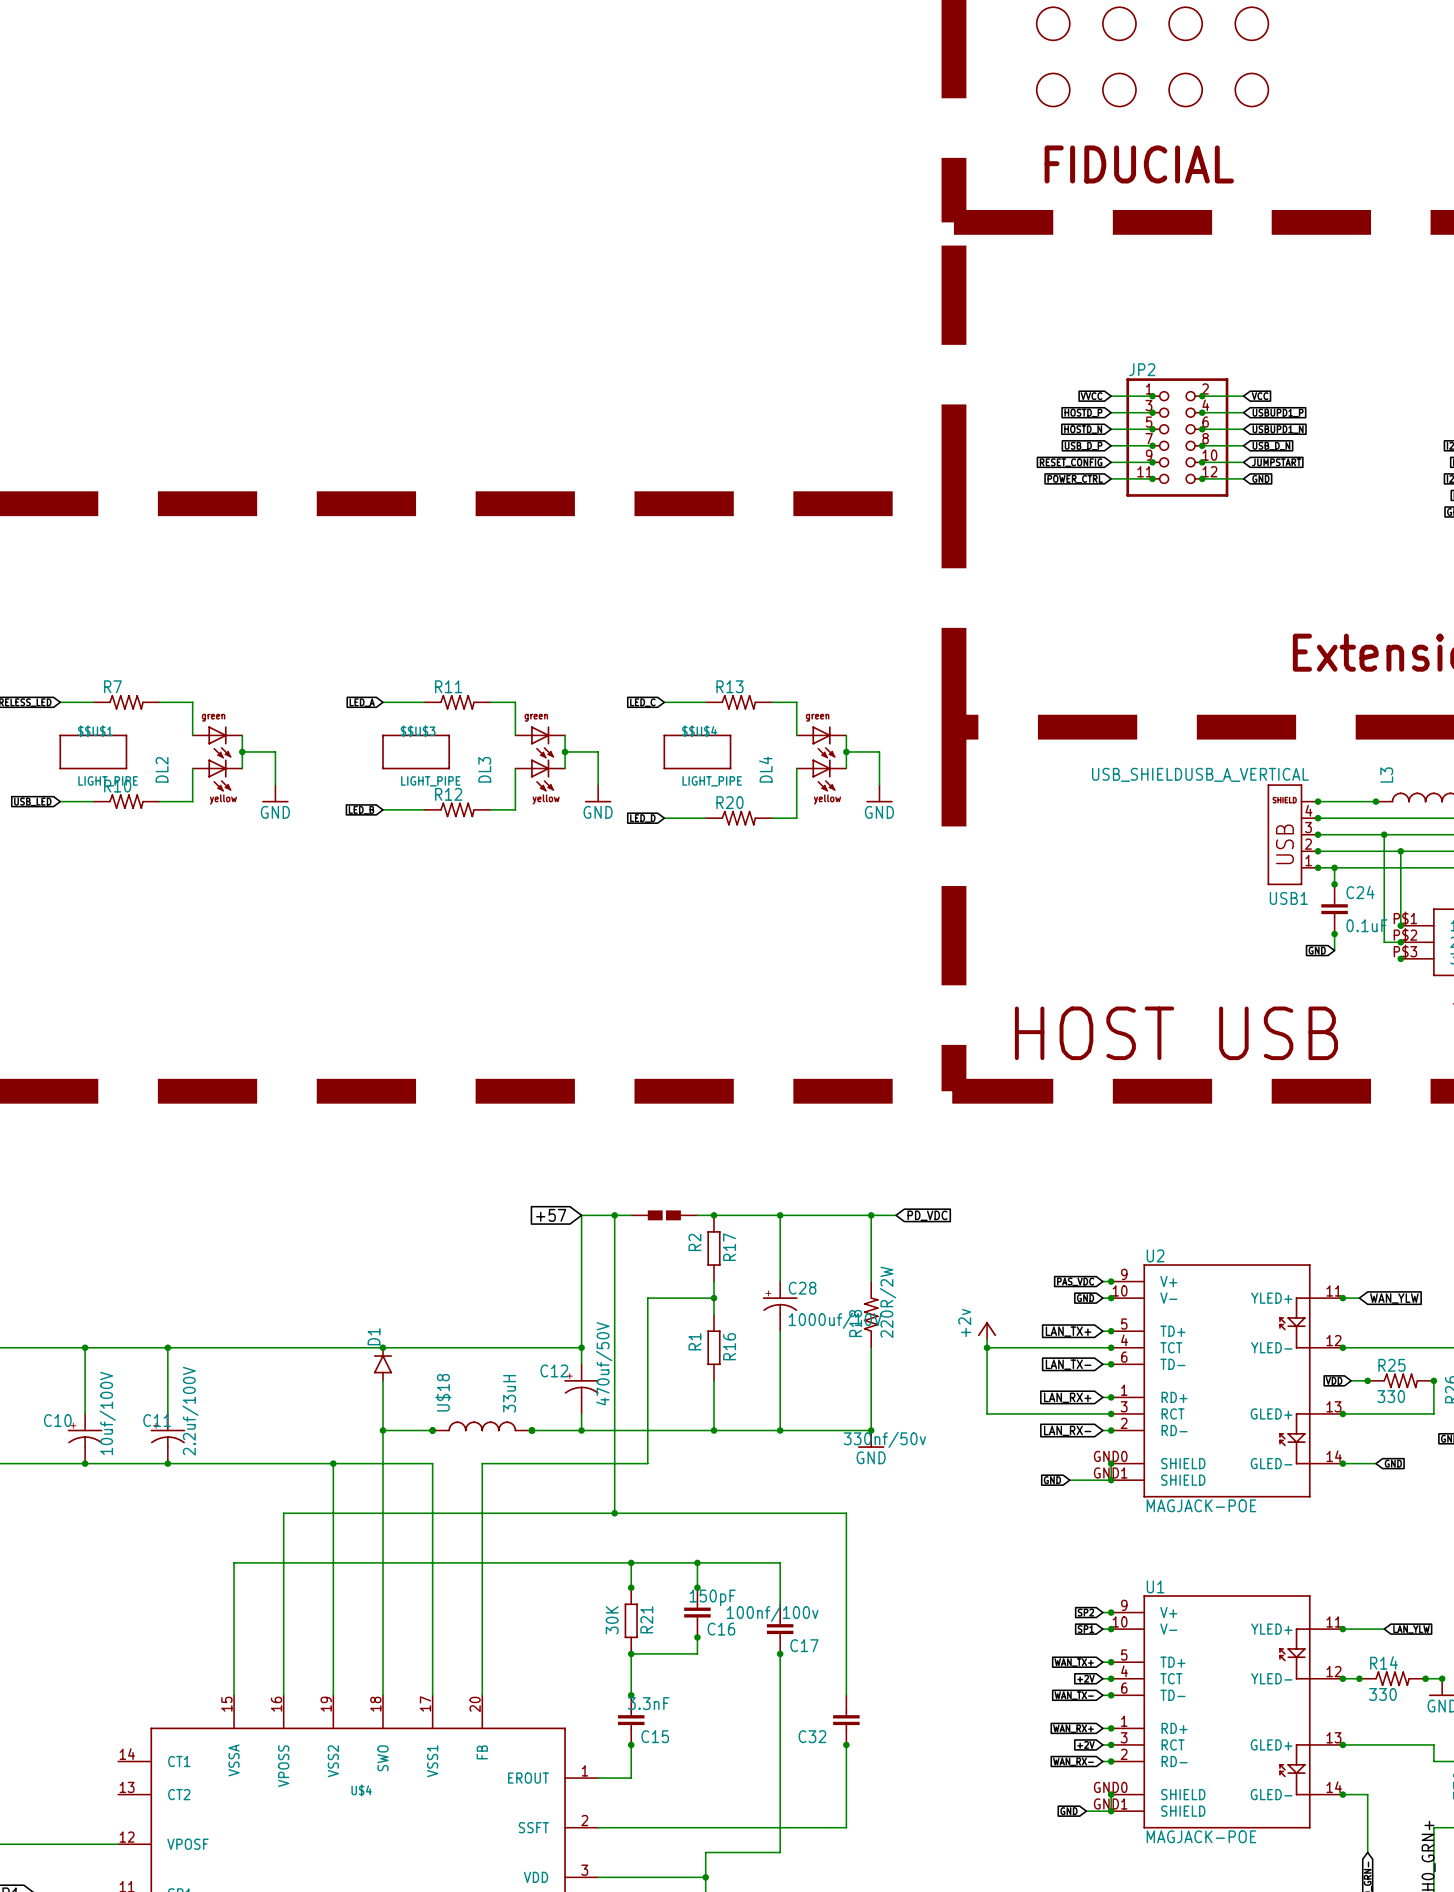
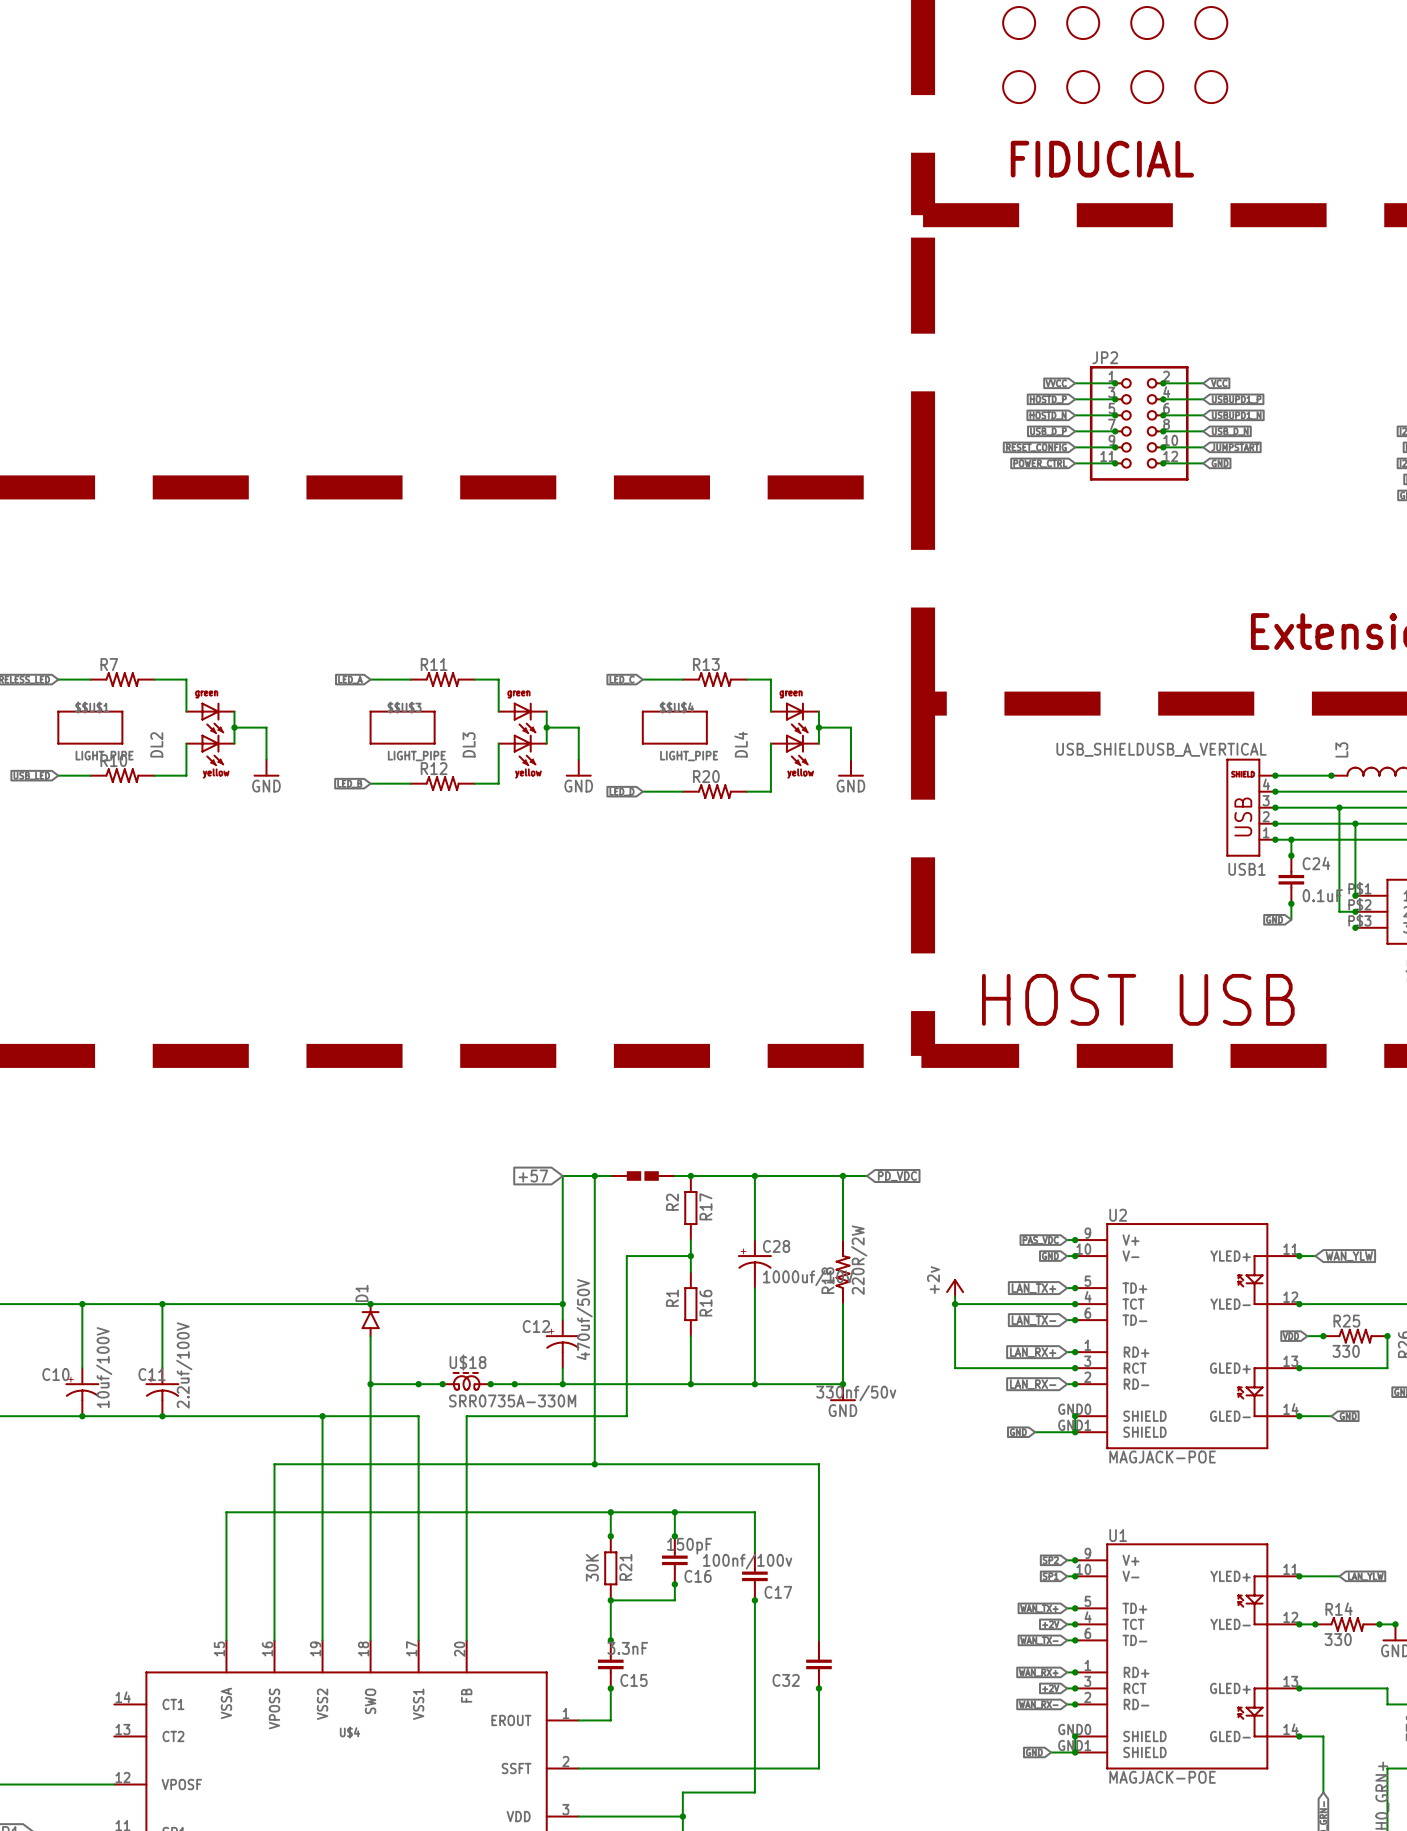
U$18 name position: U$18 (443, 1392) -> U$18 (467, 1362)
U$18 value: 33uH (509, 1393) -> SRR0735A-330M (512, 1400)
U$18 symbol: [432, 1421, 532, 1432] -> [442, 1372, 491, 1391]
junction: none -> (442, 1384)
junction: none -> (490, 1384)

